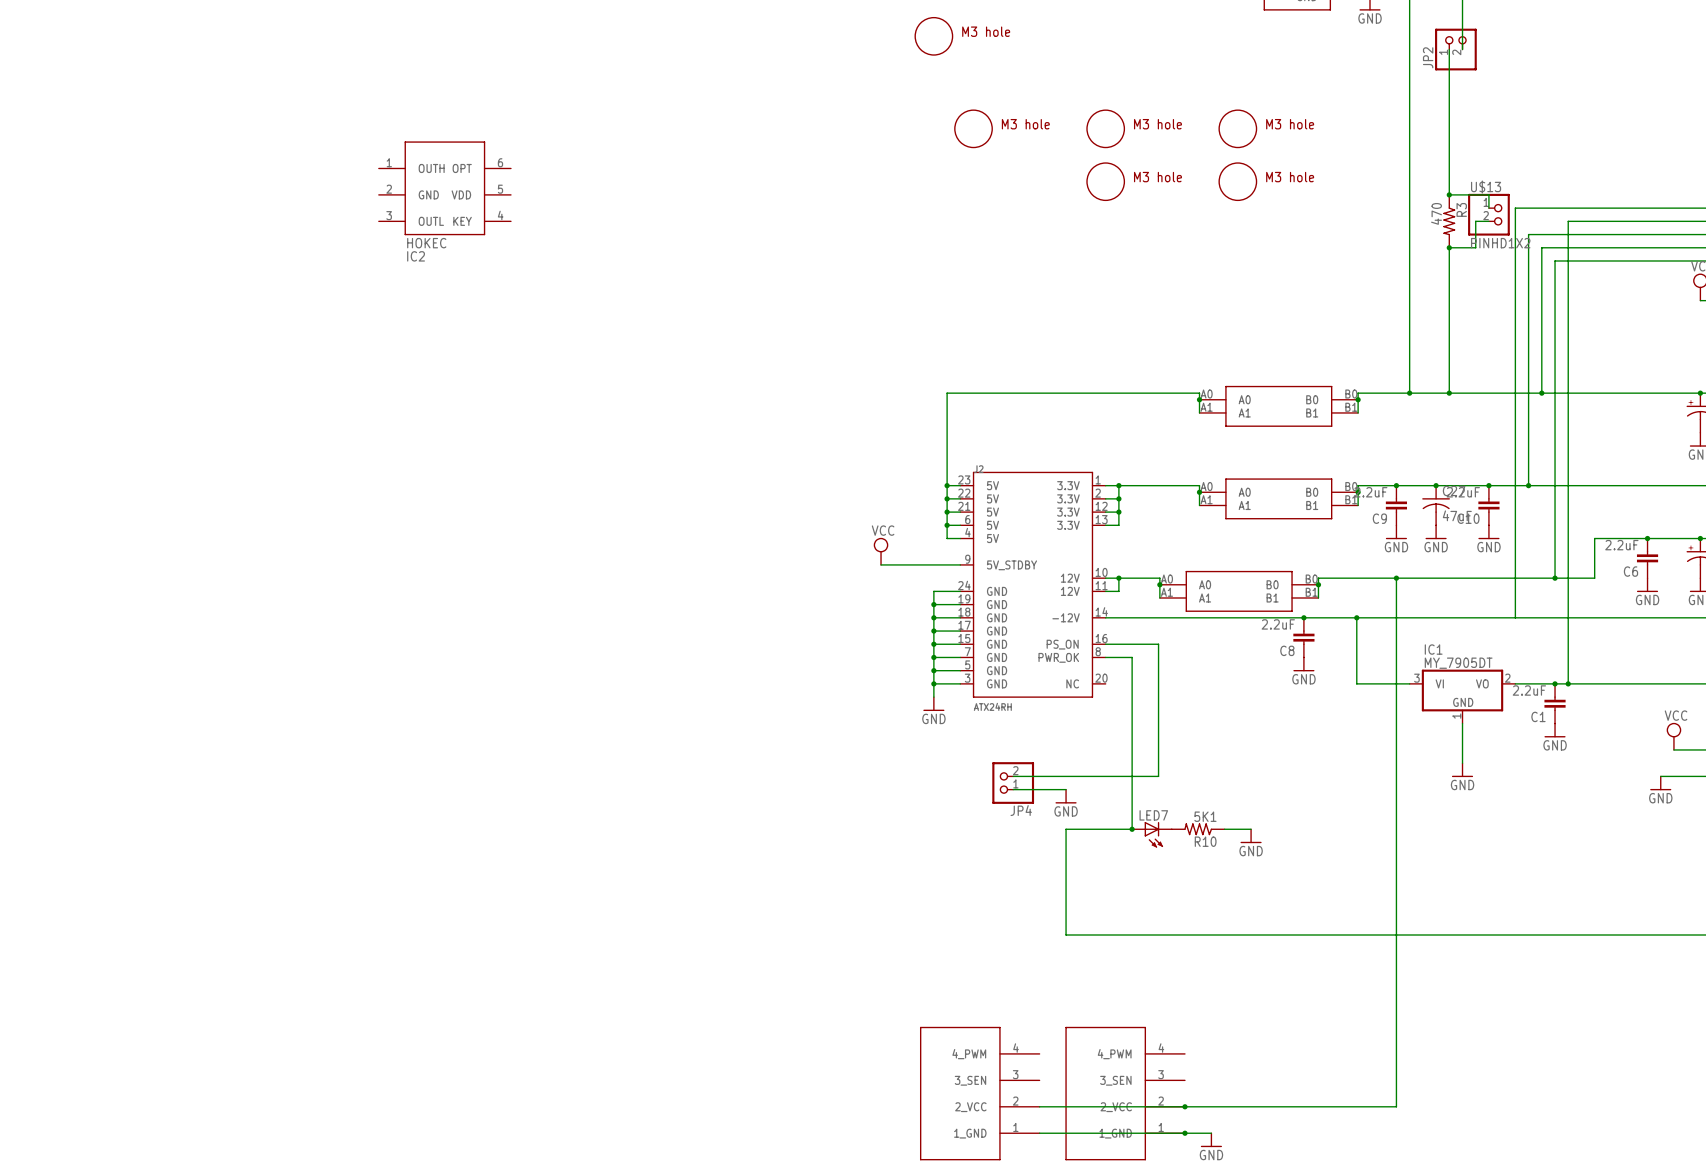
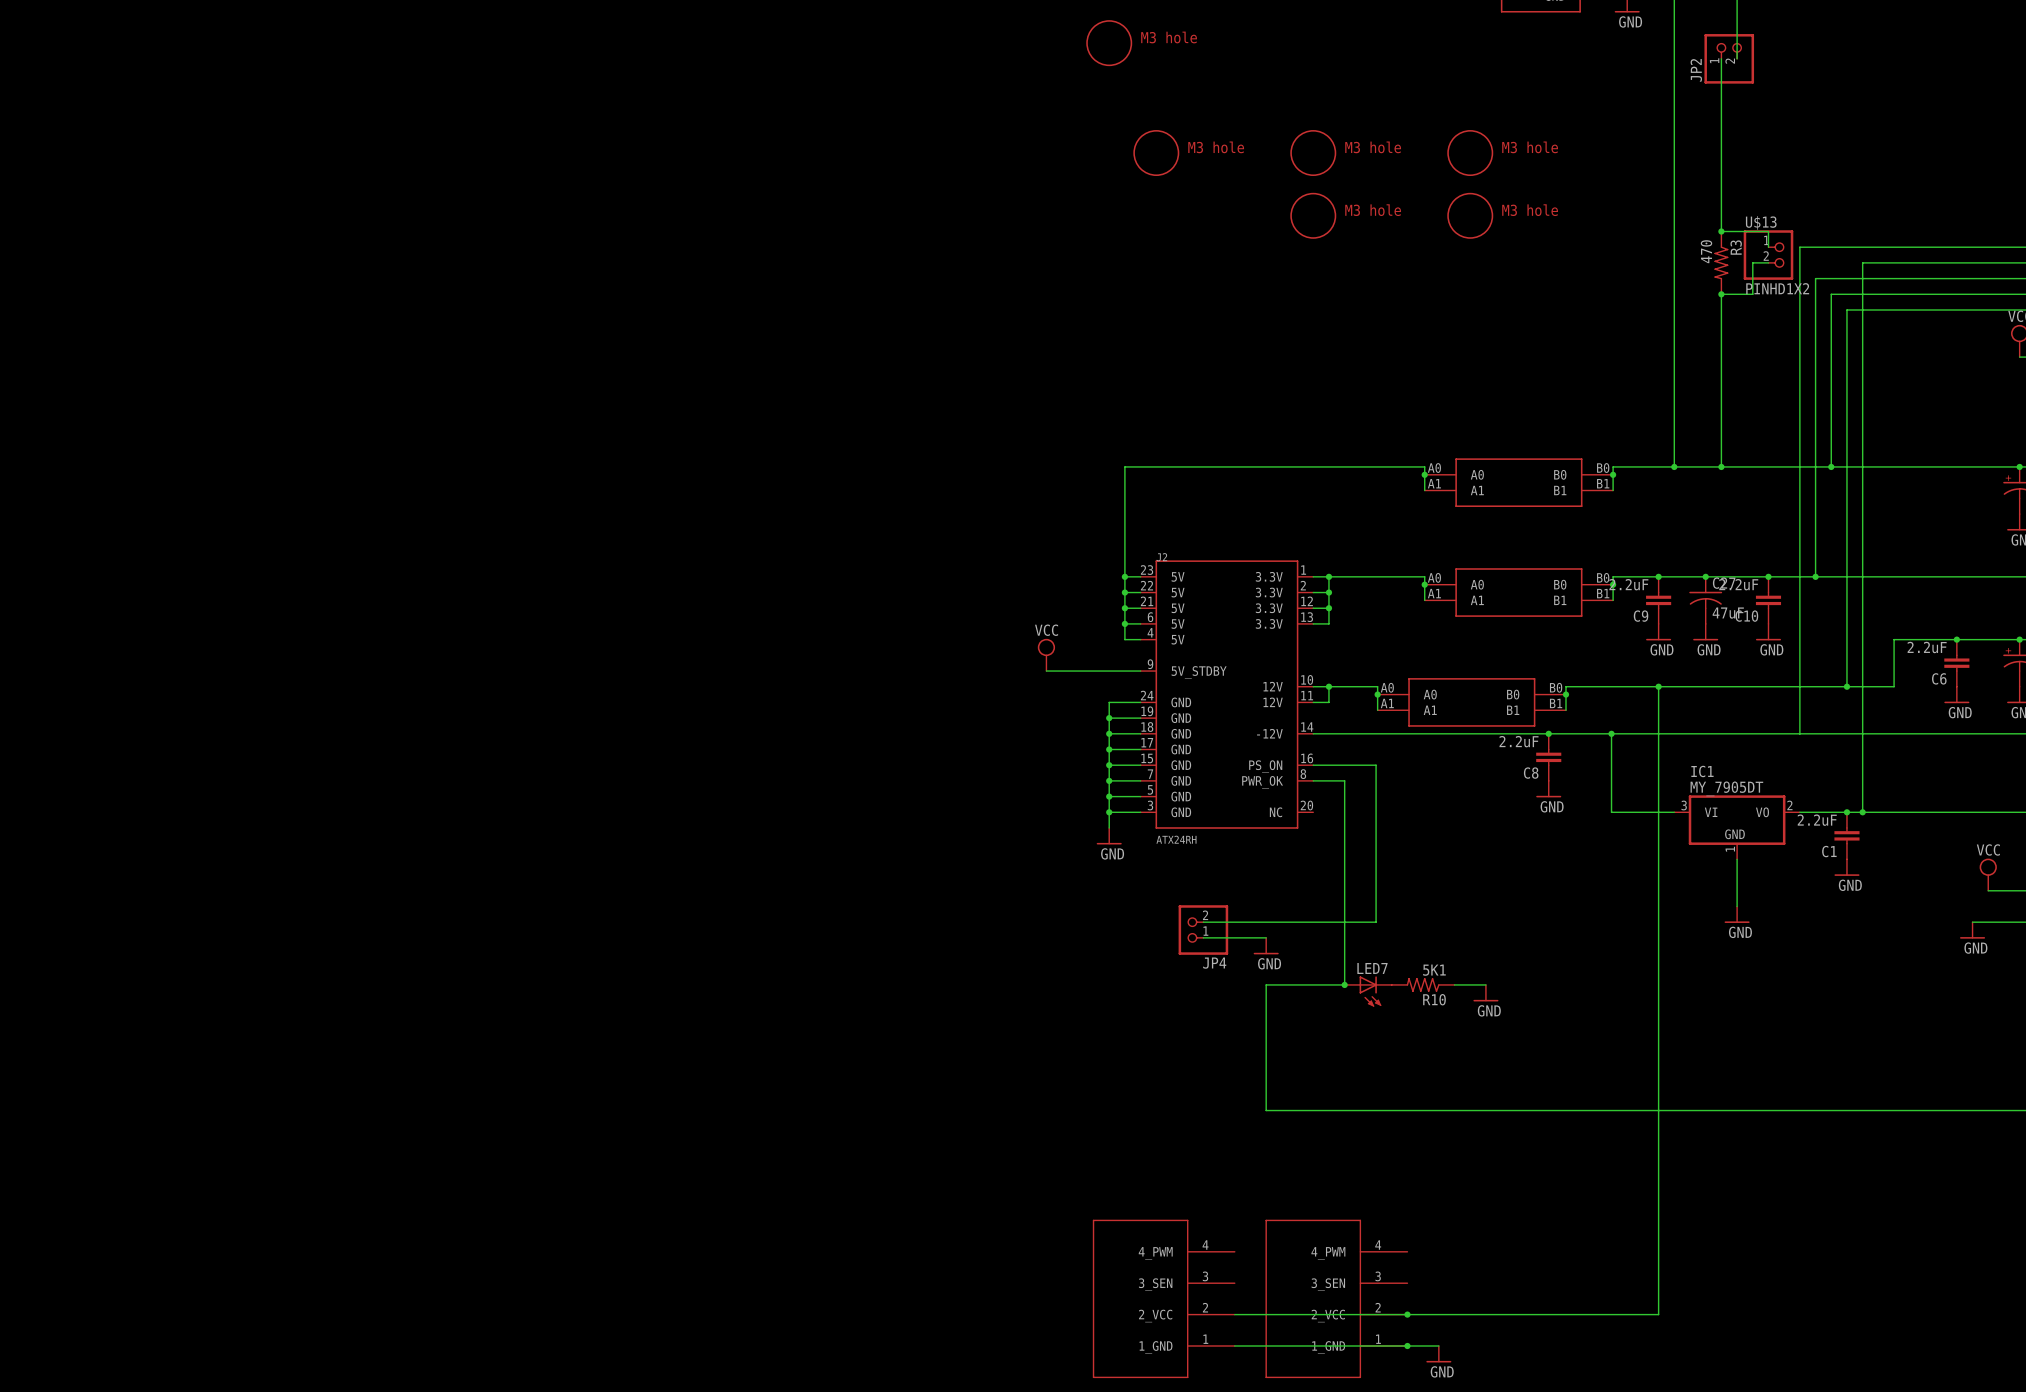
IC2: (444, 188) -> none

